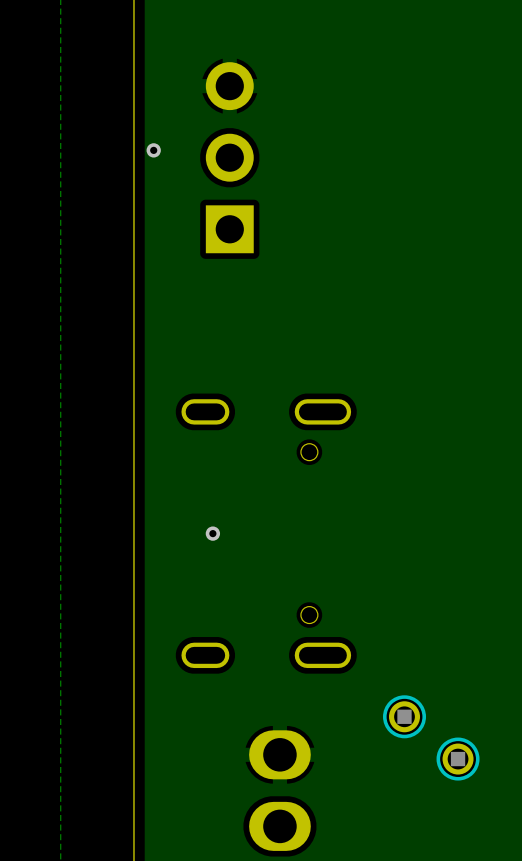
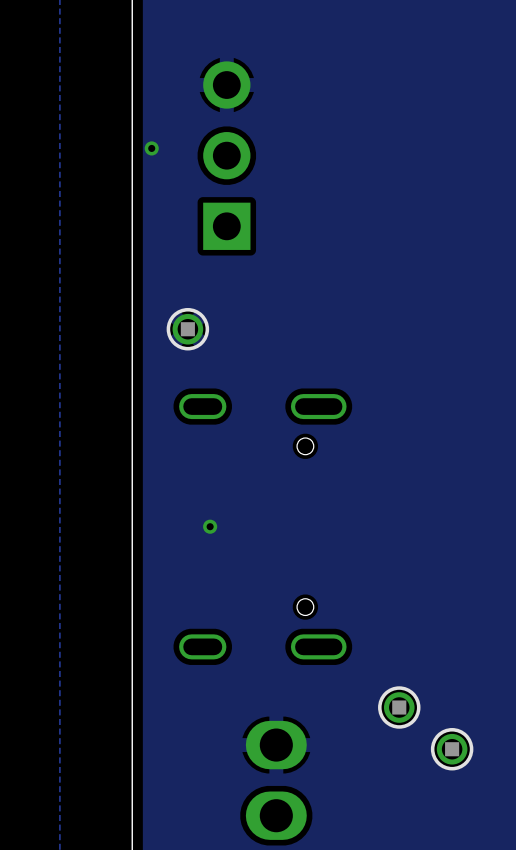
part: none -> (187, 329)

